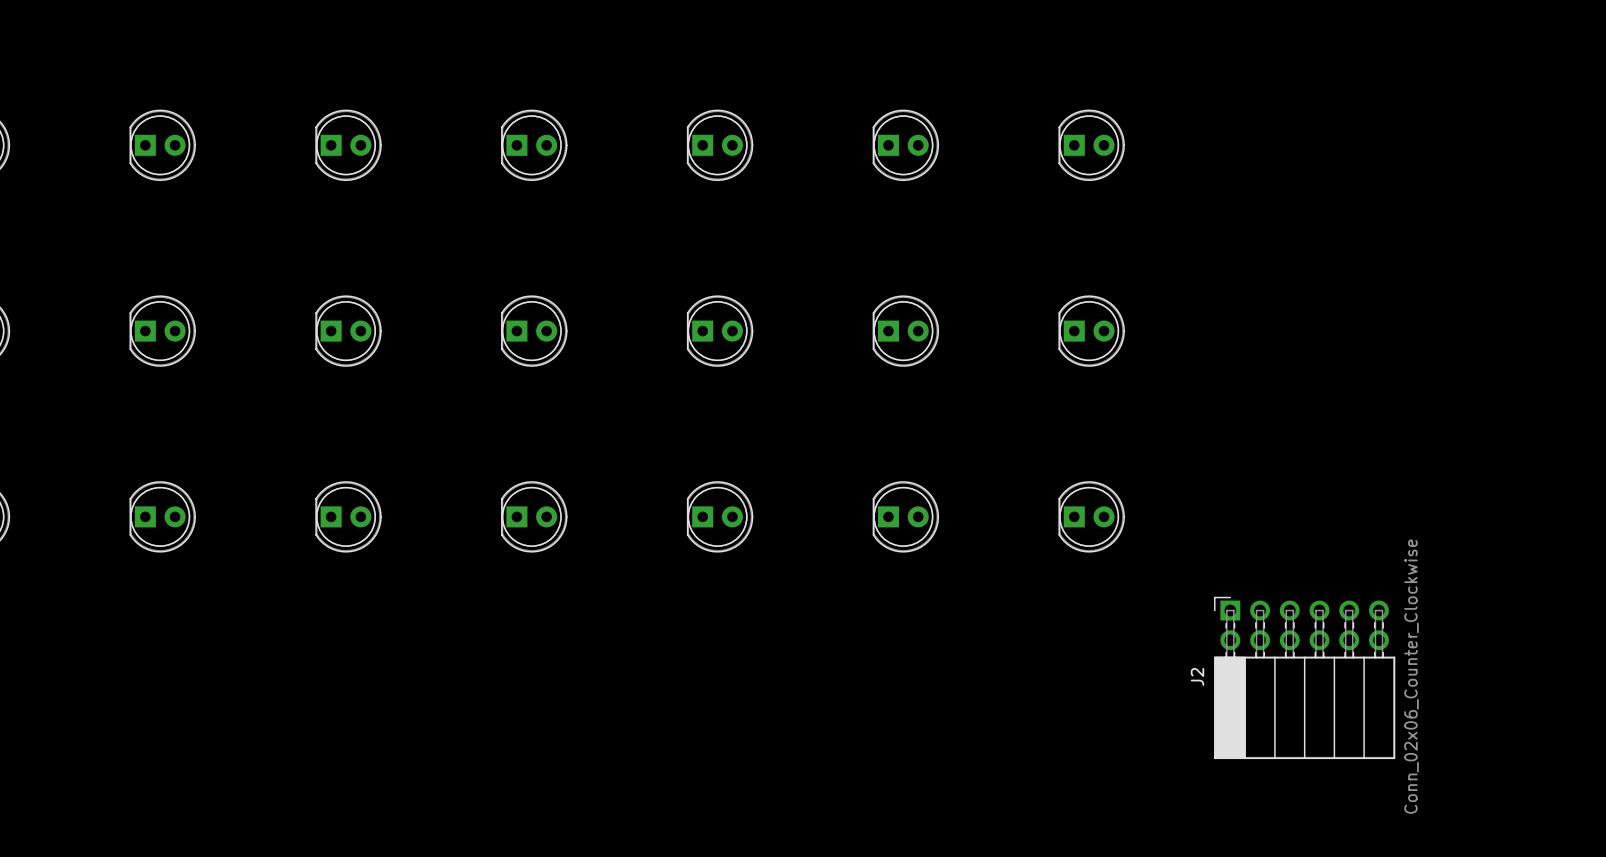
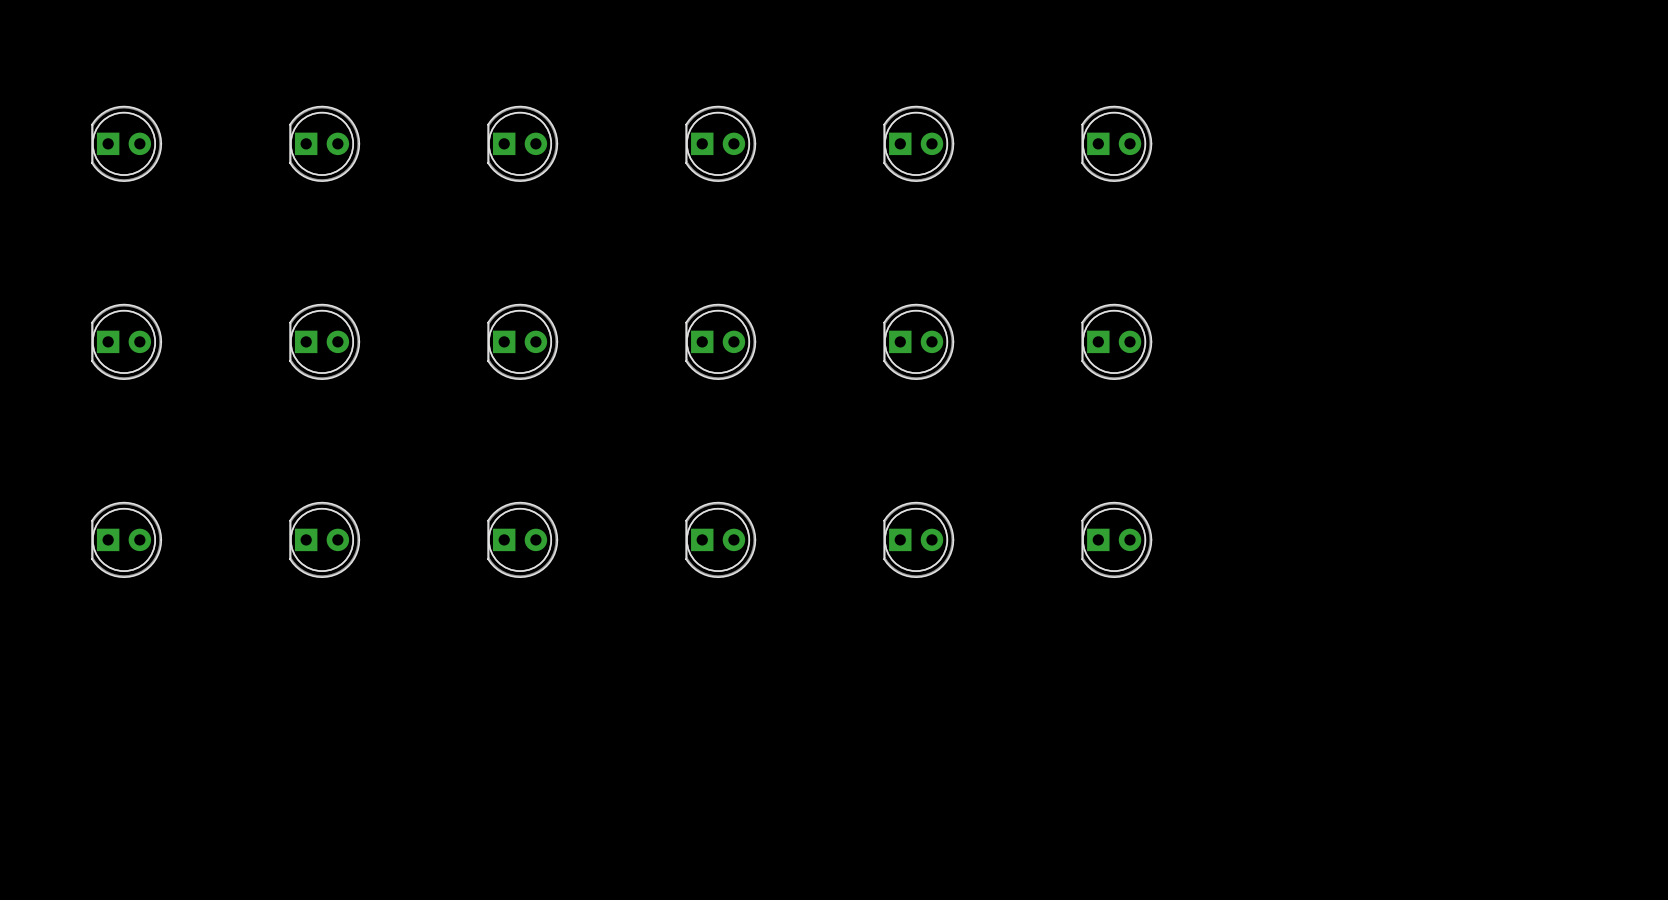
J2: Conn_02x06_Counter_Clockwise (1304, 677) -> none

